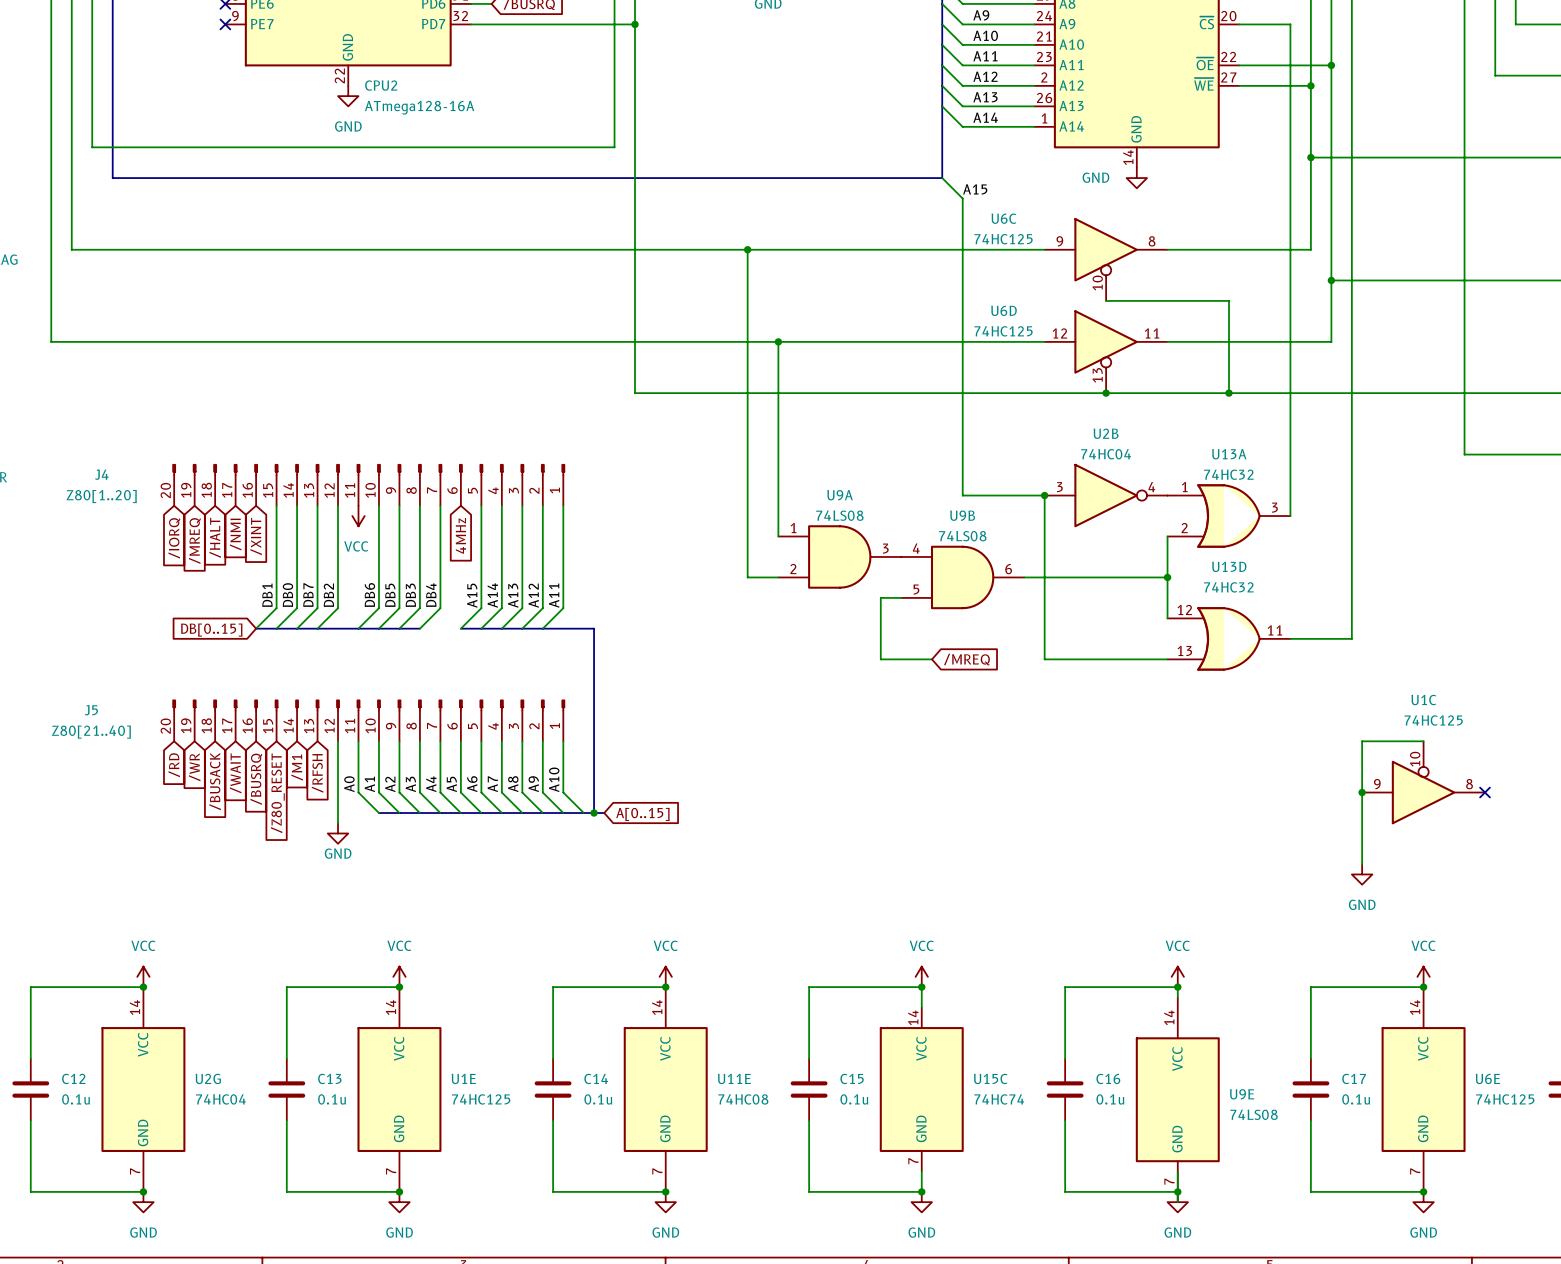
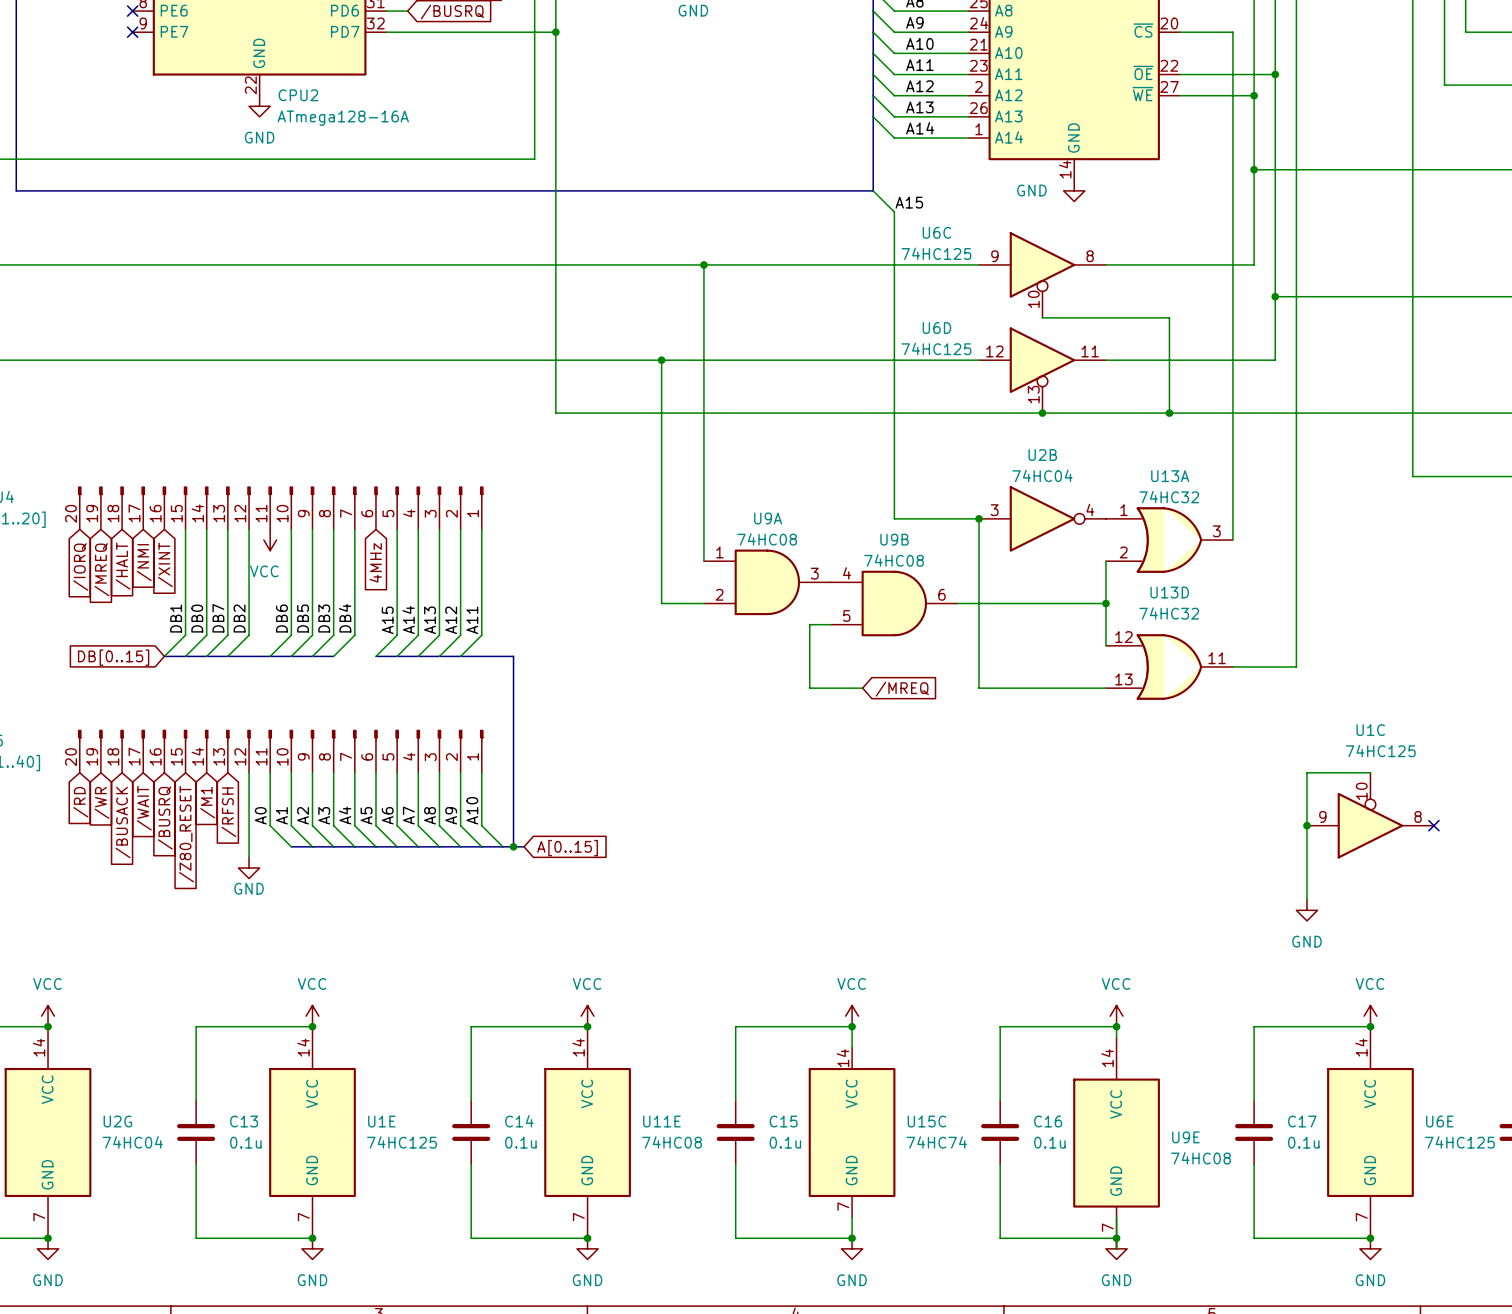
wire: (747, 249) (747, 577) -> (661, 360) (661, 603) (672, 603)
junction position: (747, 249) -> (703, 264)
wire: none -> (703, 264) (703, 360)
junction position: (778, 341) -> (661, 360)
U9A value: 74LS08 (839, 515) -> 74HC08 (767, 539)
U9B value: 74LS08 (962, 536) -> 74HC08 (894, 560)
U9E value: 74LS08 (1254, 1114) -> 74HC08 (1201, 1158)

